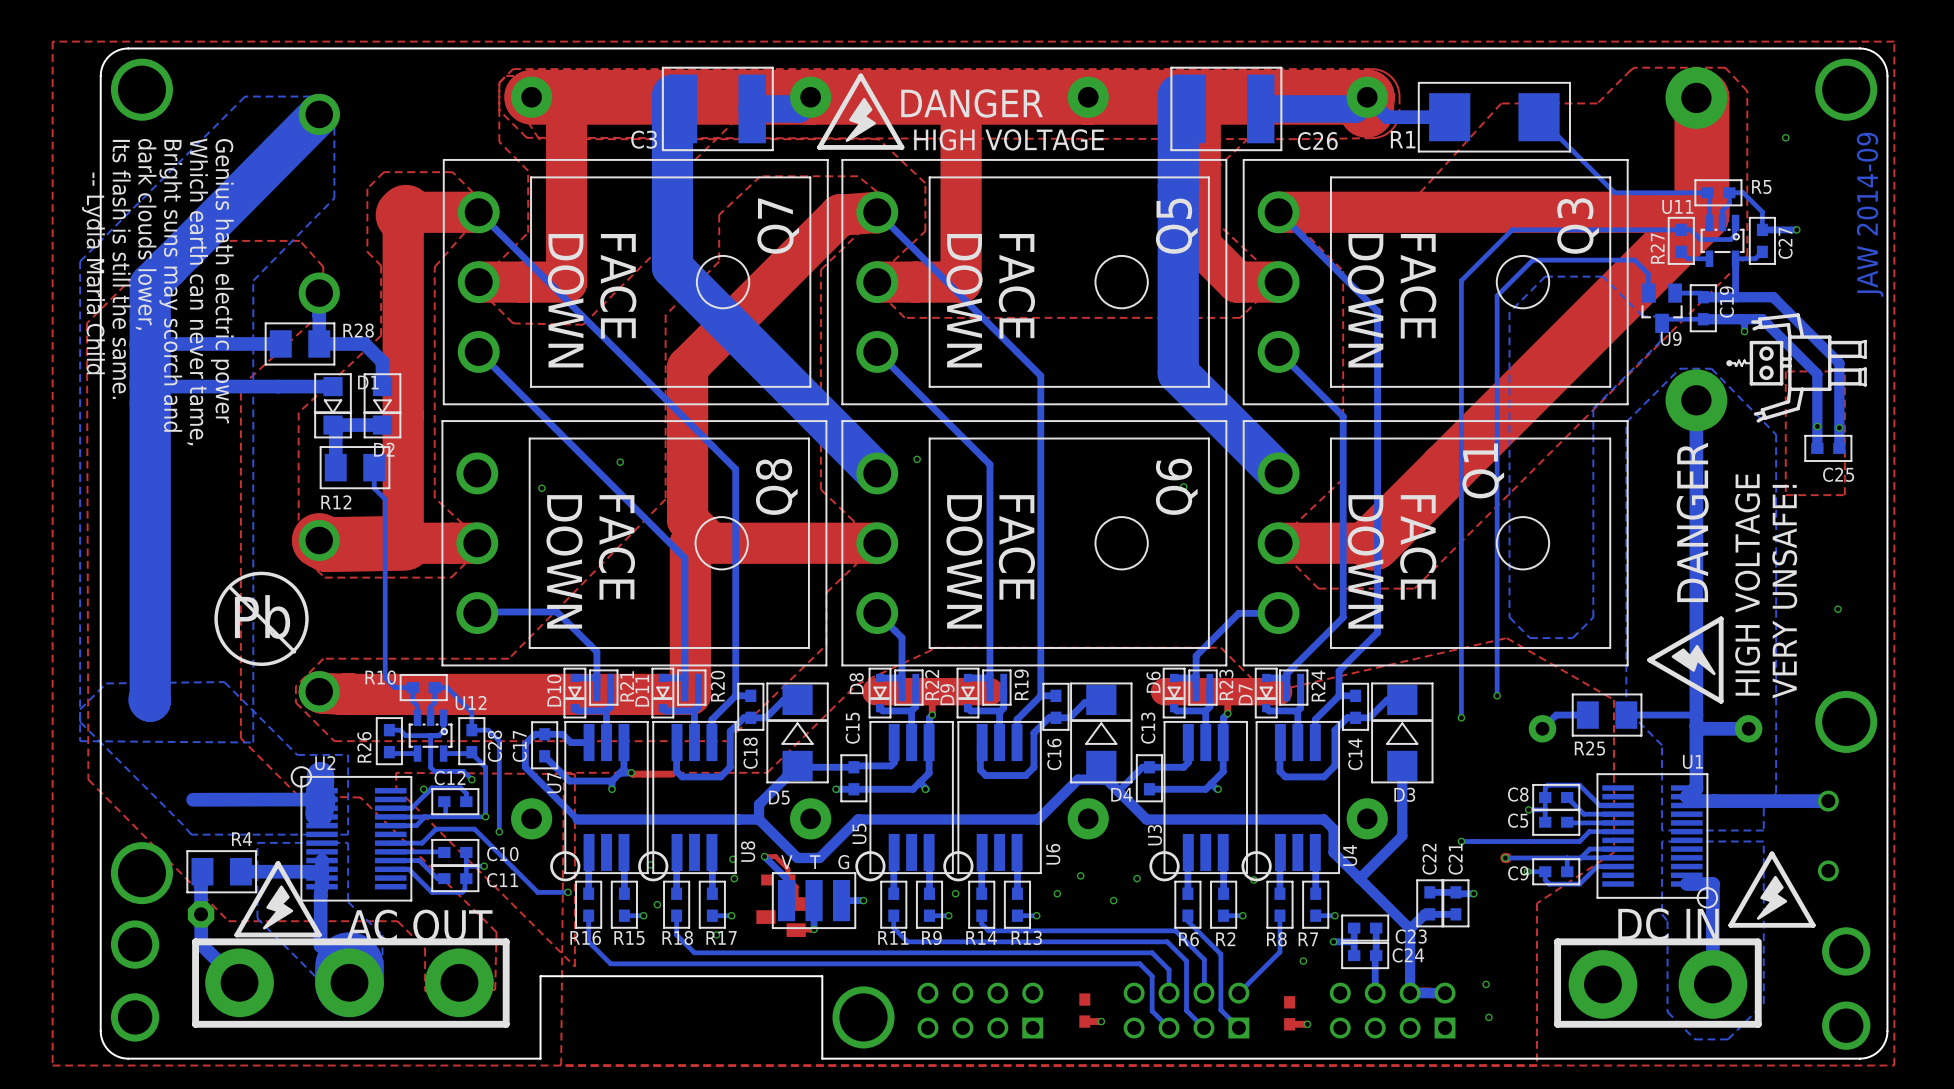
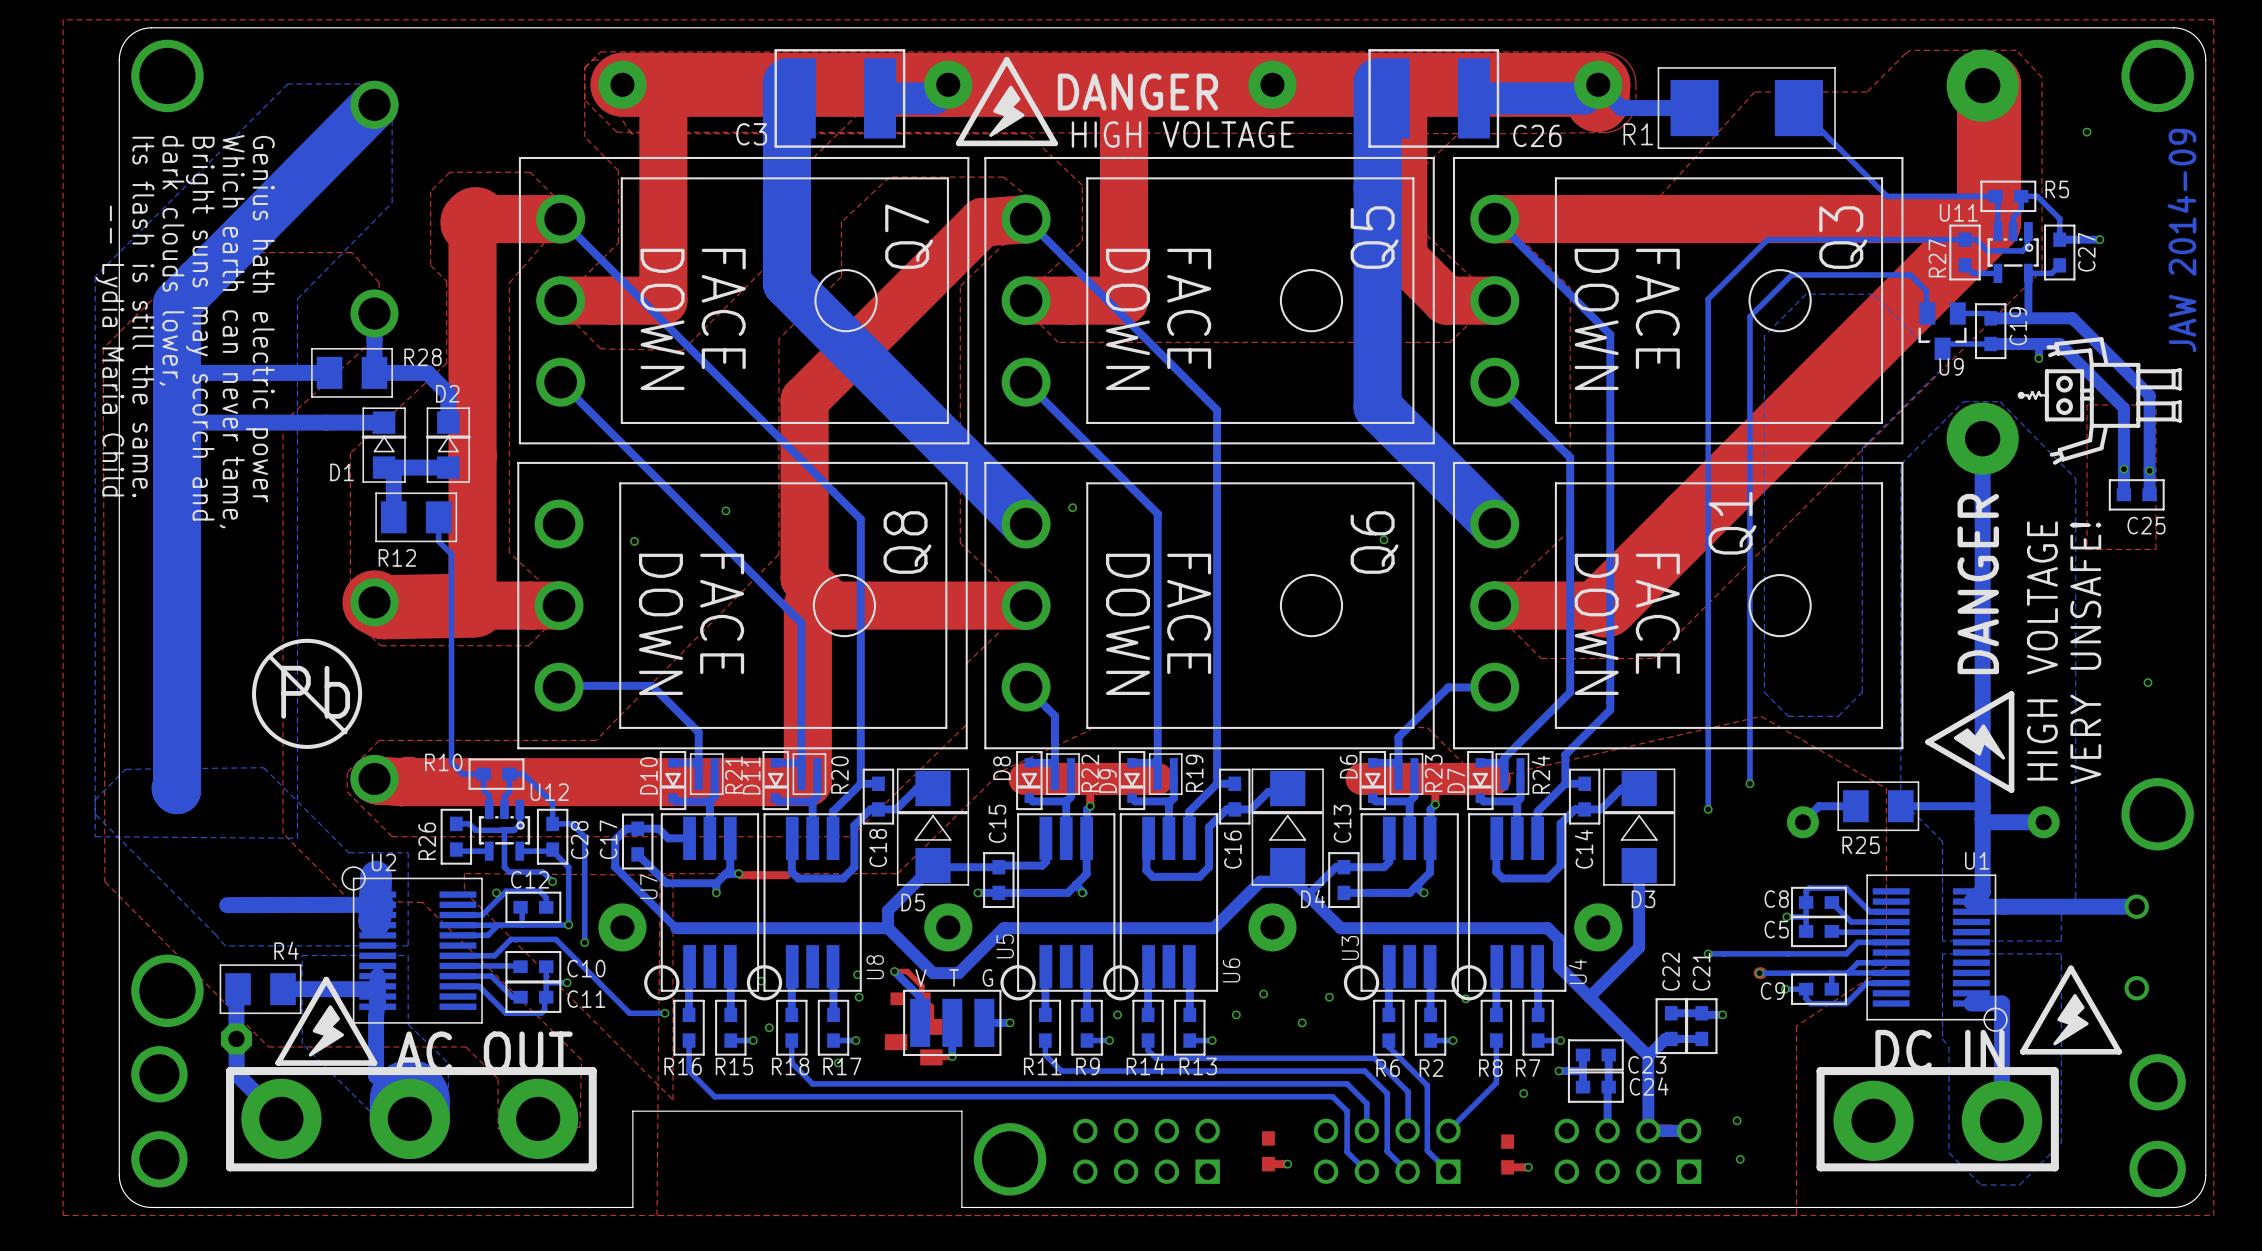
D1 rotation: 0° (333, 405) -> 180° (384, 445)
D2 rotation: 0° (382, 405) -> 180° (448, 445)

